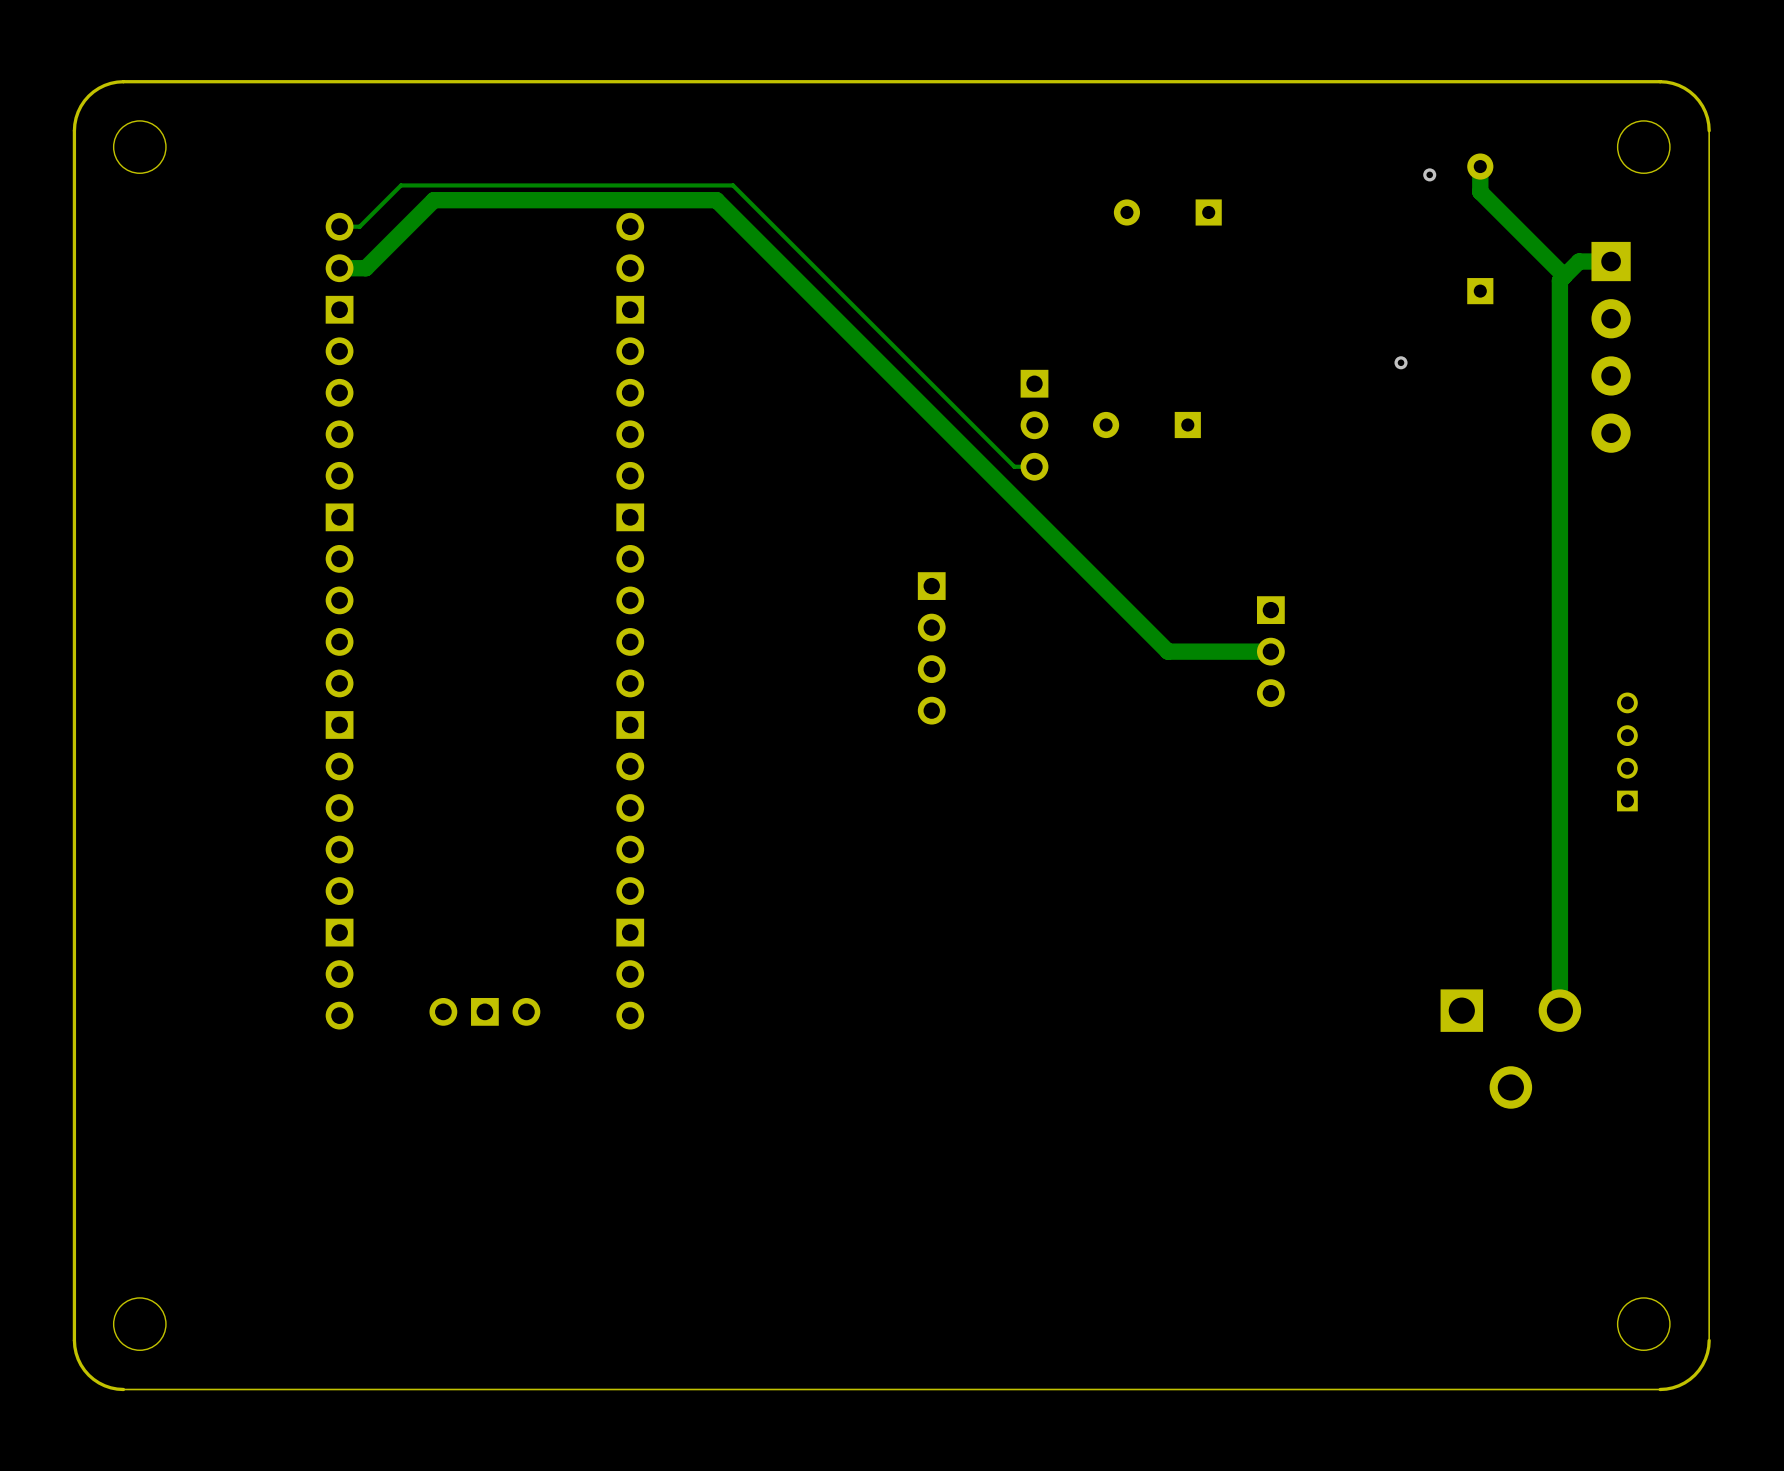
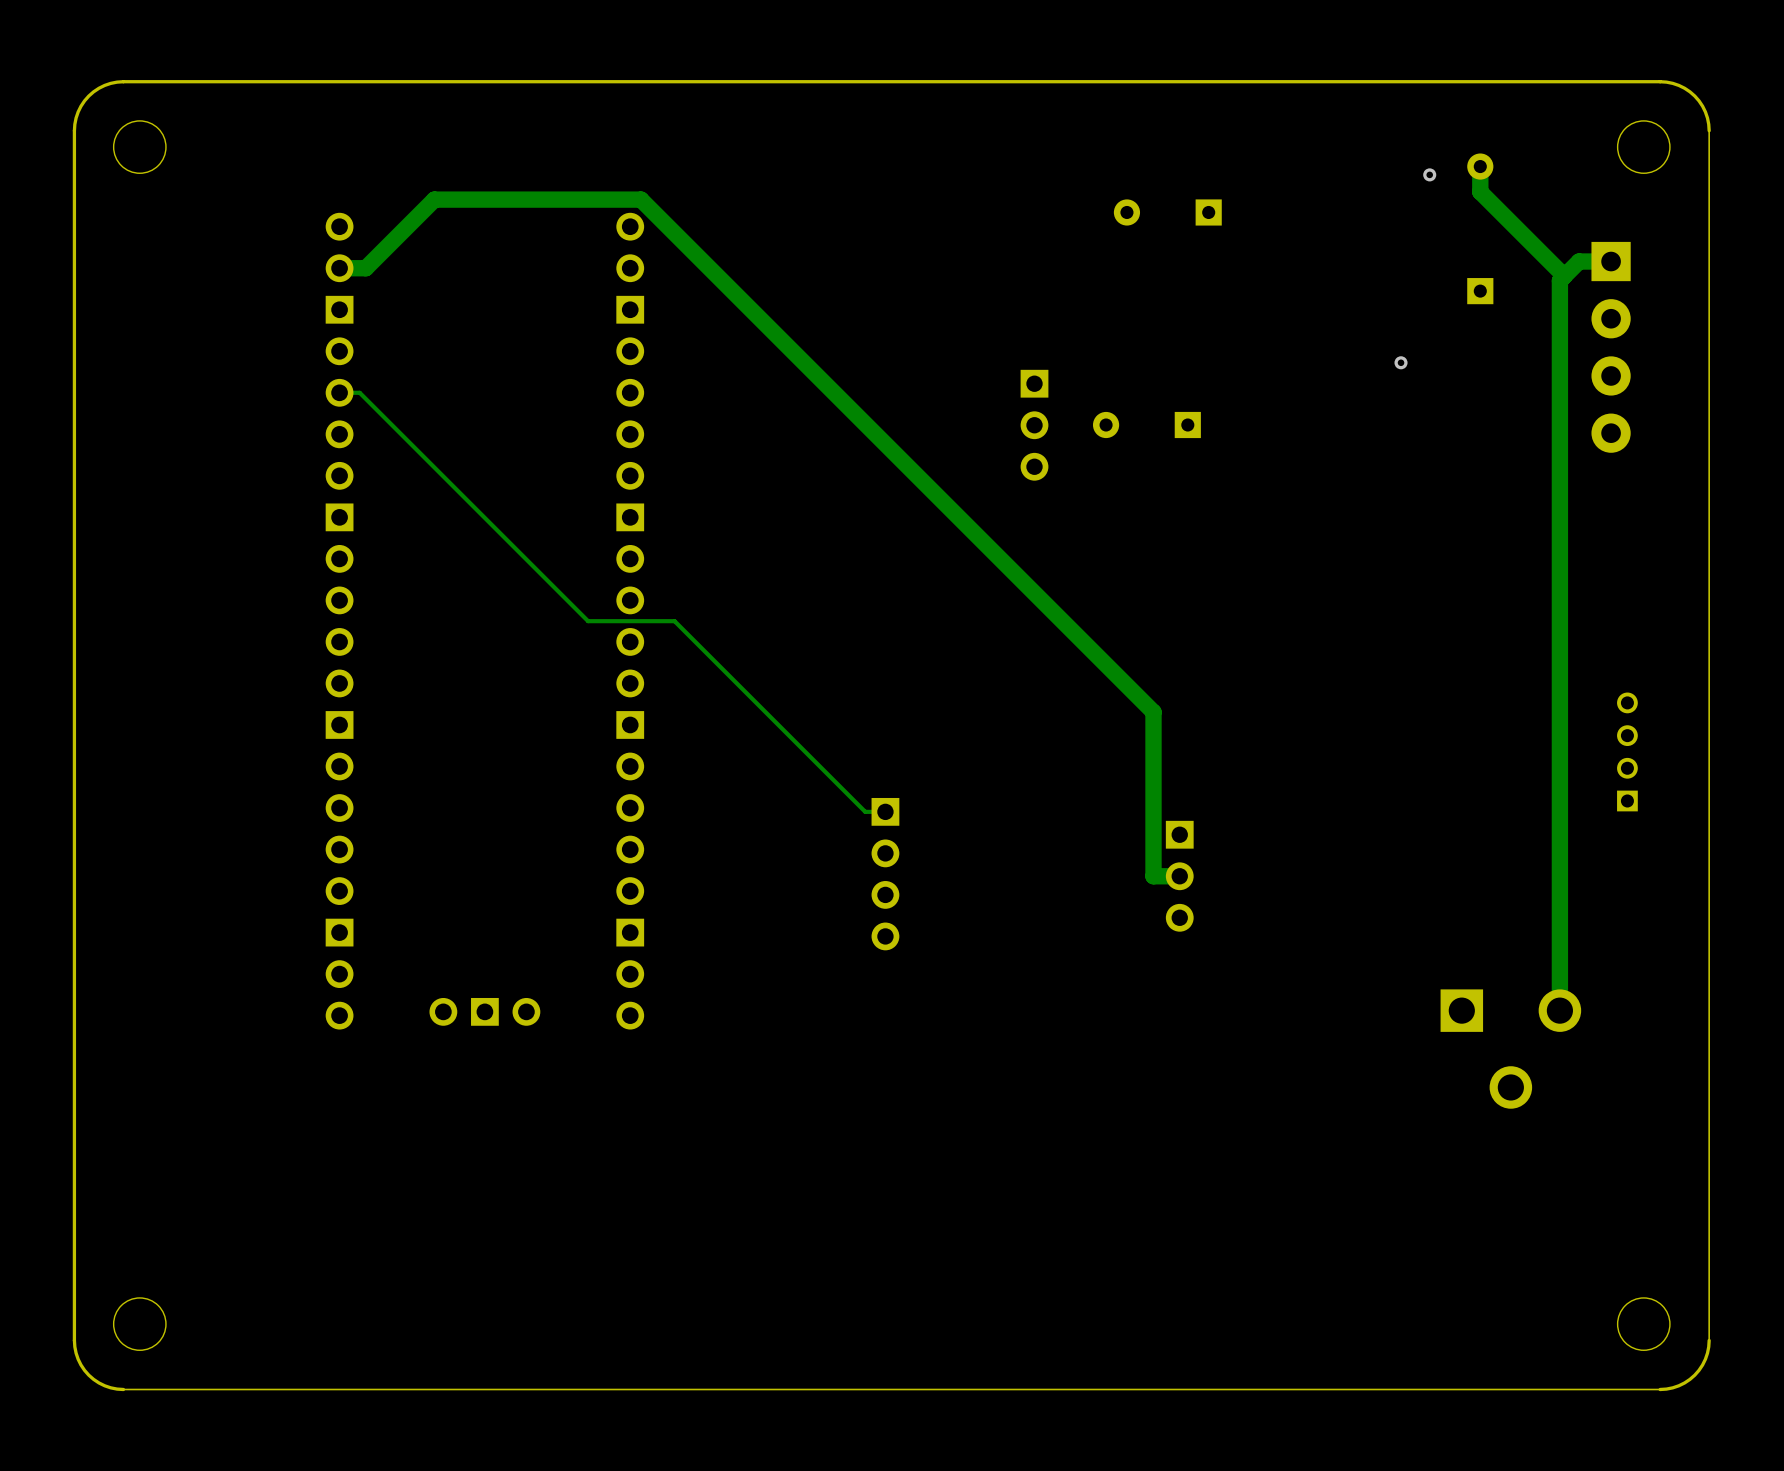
track: (433, 200) (716, 200) (1167, 651) (1270, 651) -> (433, 200) (640, 199) (1153, 712) (1153, 876) (1179, 876)
track: (339, 226) (359, 226) (400, 185) (733, 185) (1014, 466) (1034, 466) -> none
track: none -> (339, 392) (359, 392) (588, 621) (674, 621) (865, 811) (885, 811)
part position: (931, 648) -> (885, 874)
part position: (1270, 651) -> (1179, 876)

